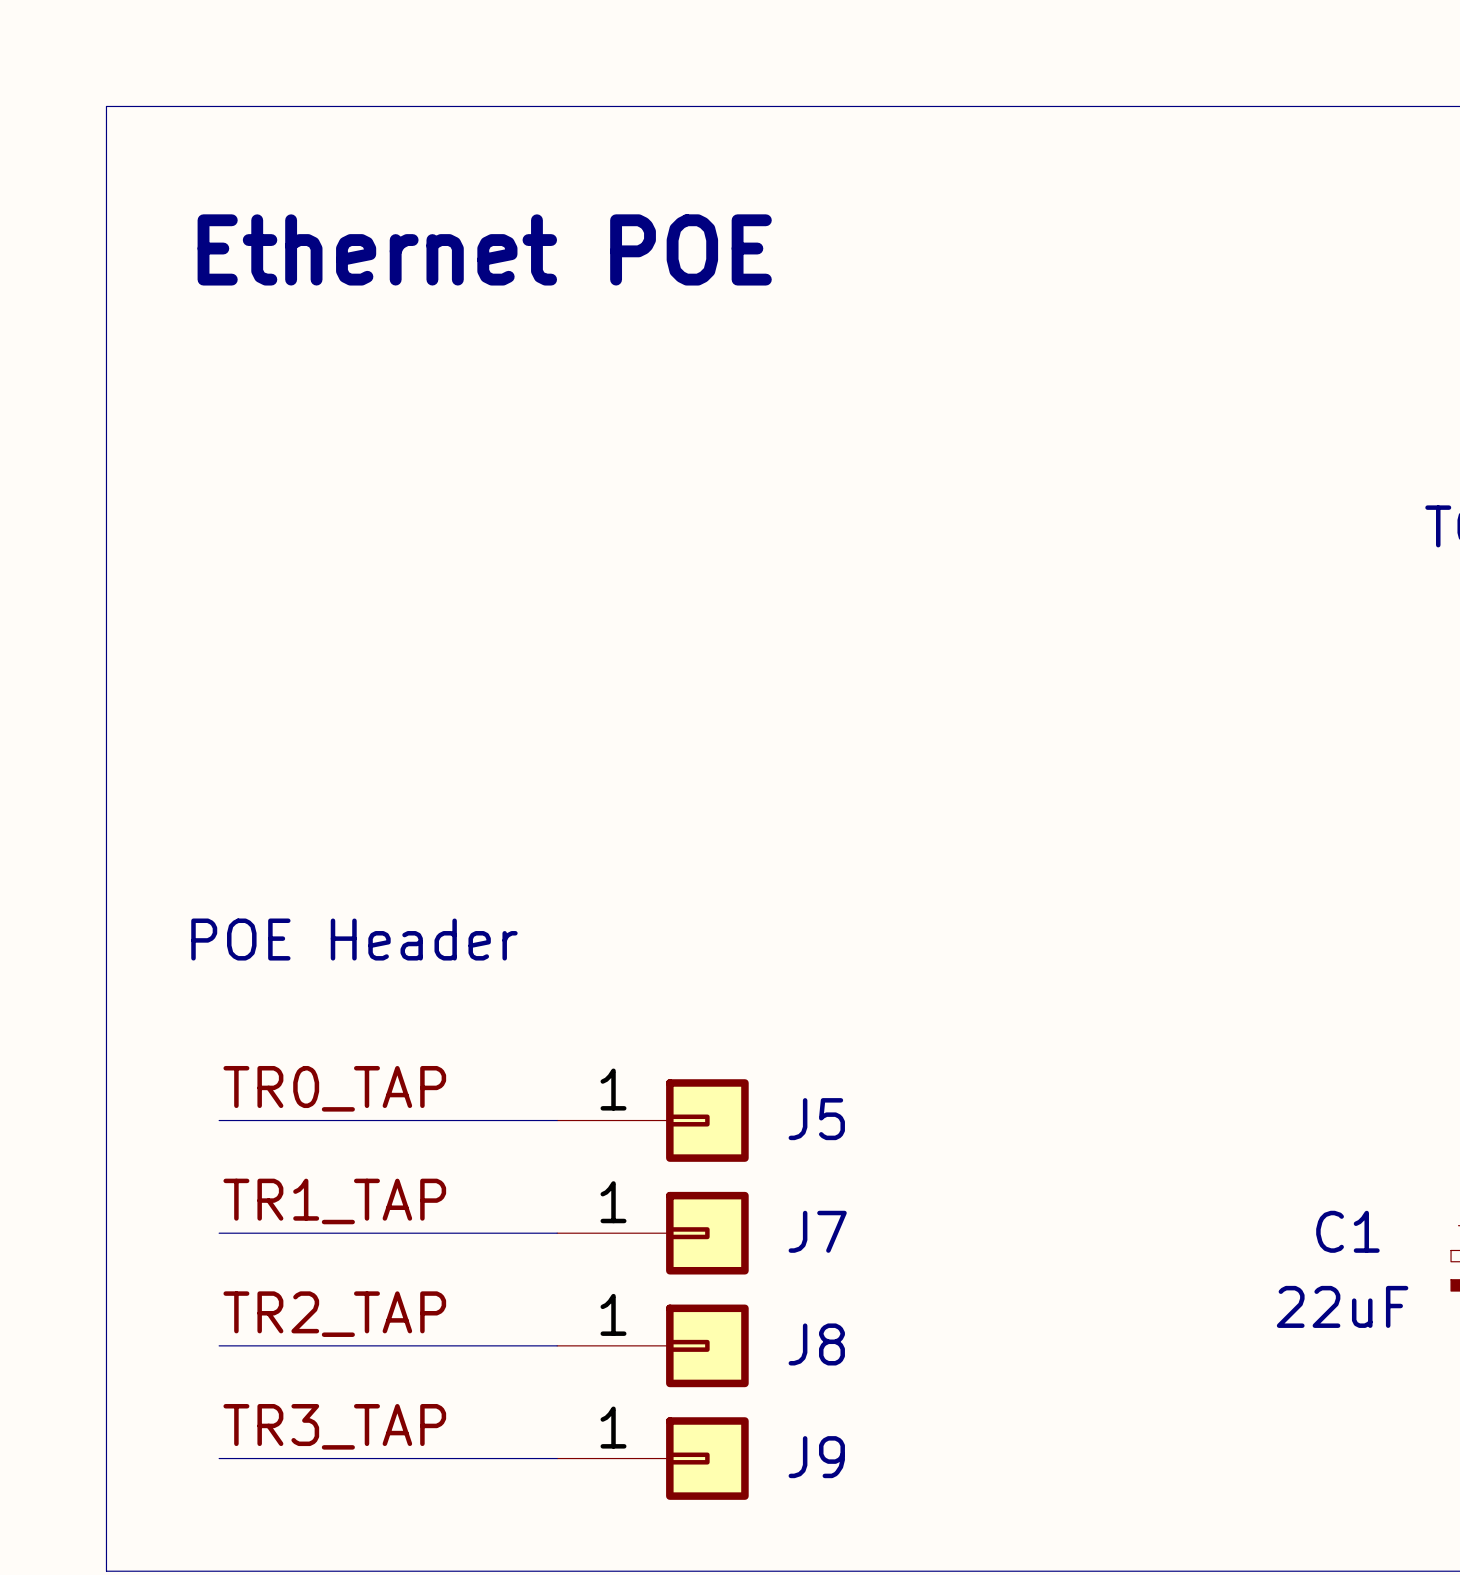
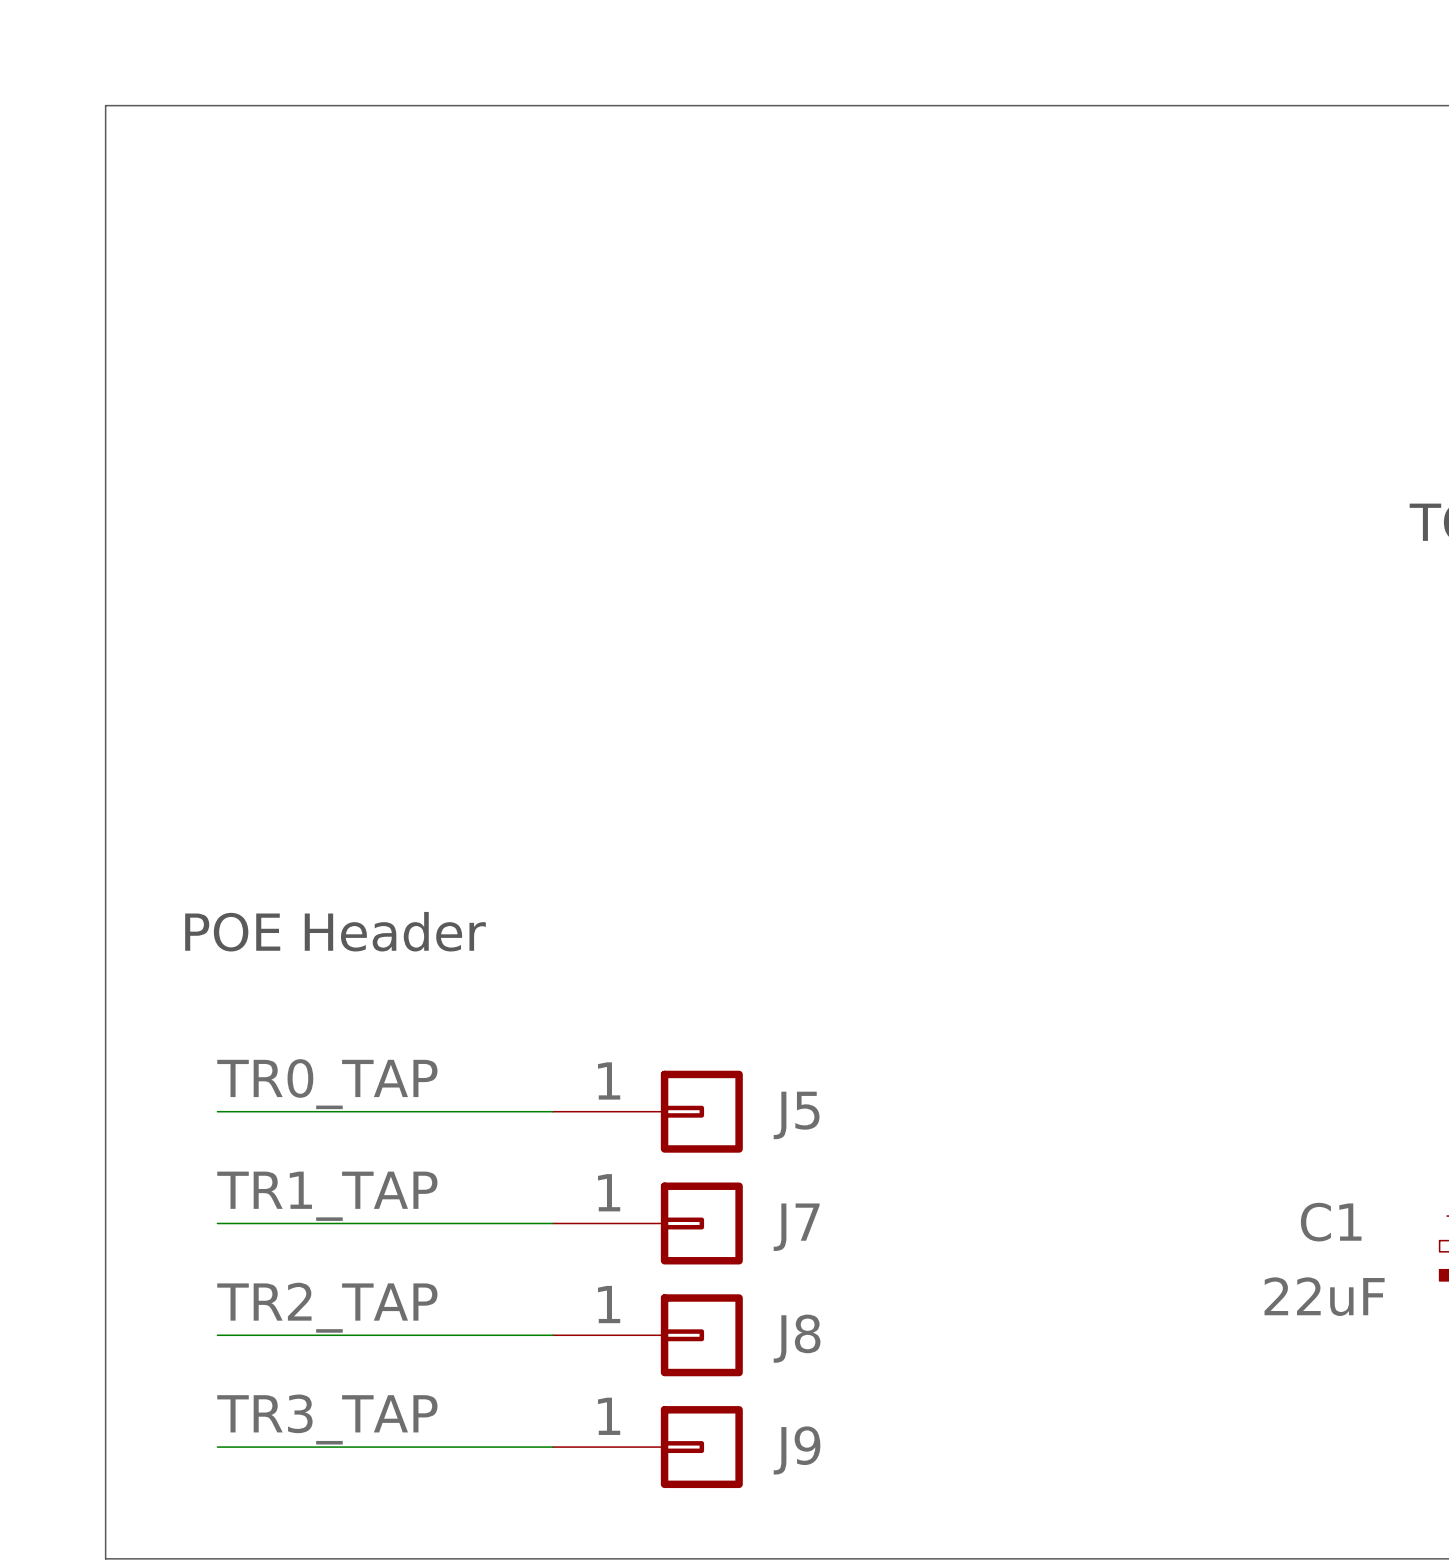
text: Ethernet POE (484, 249) -> none

